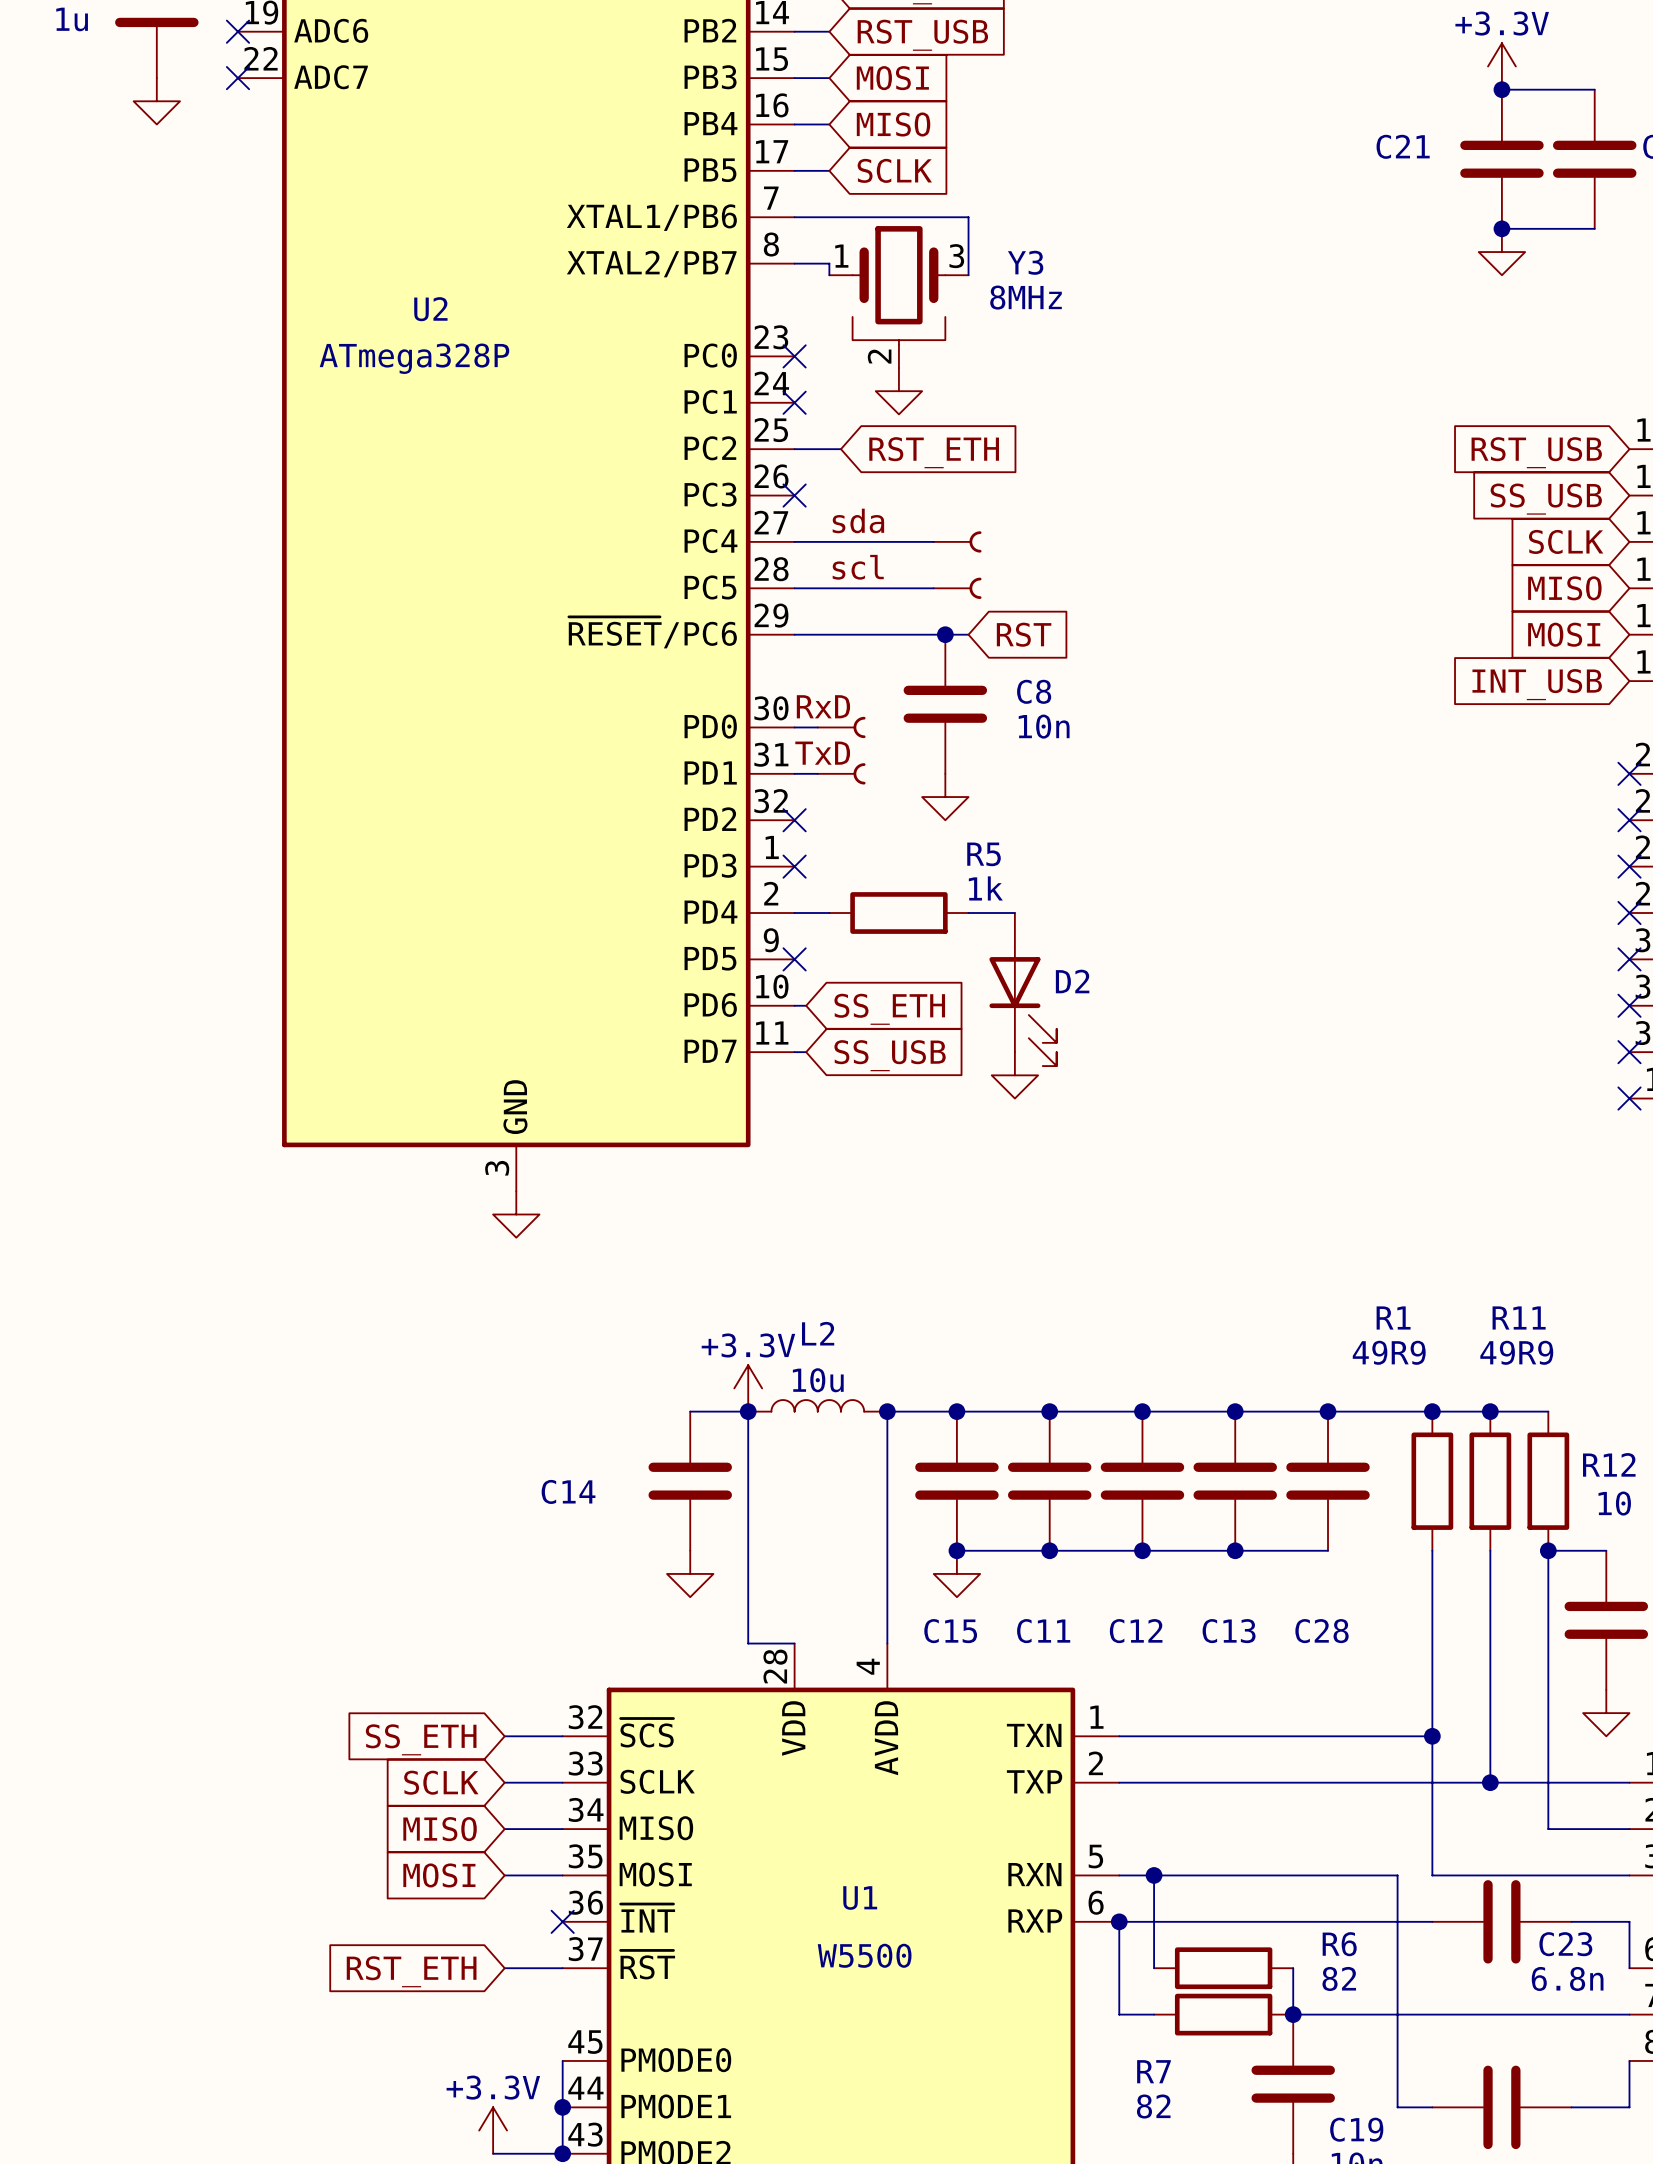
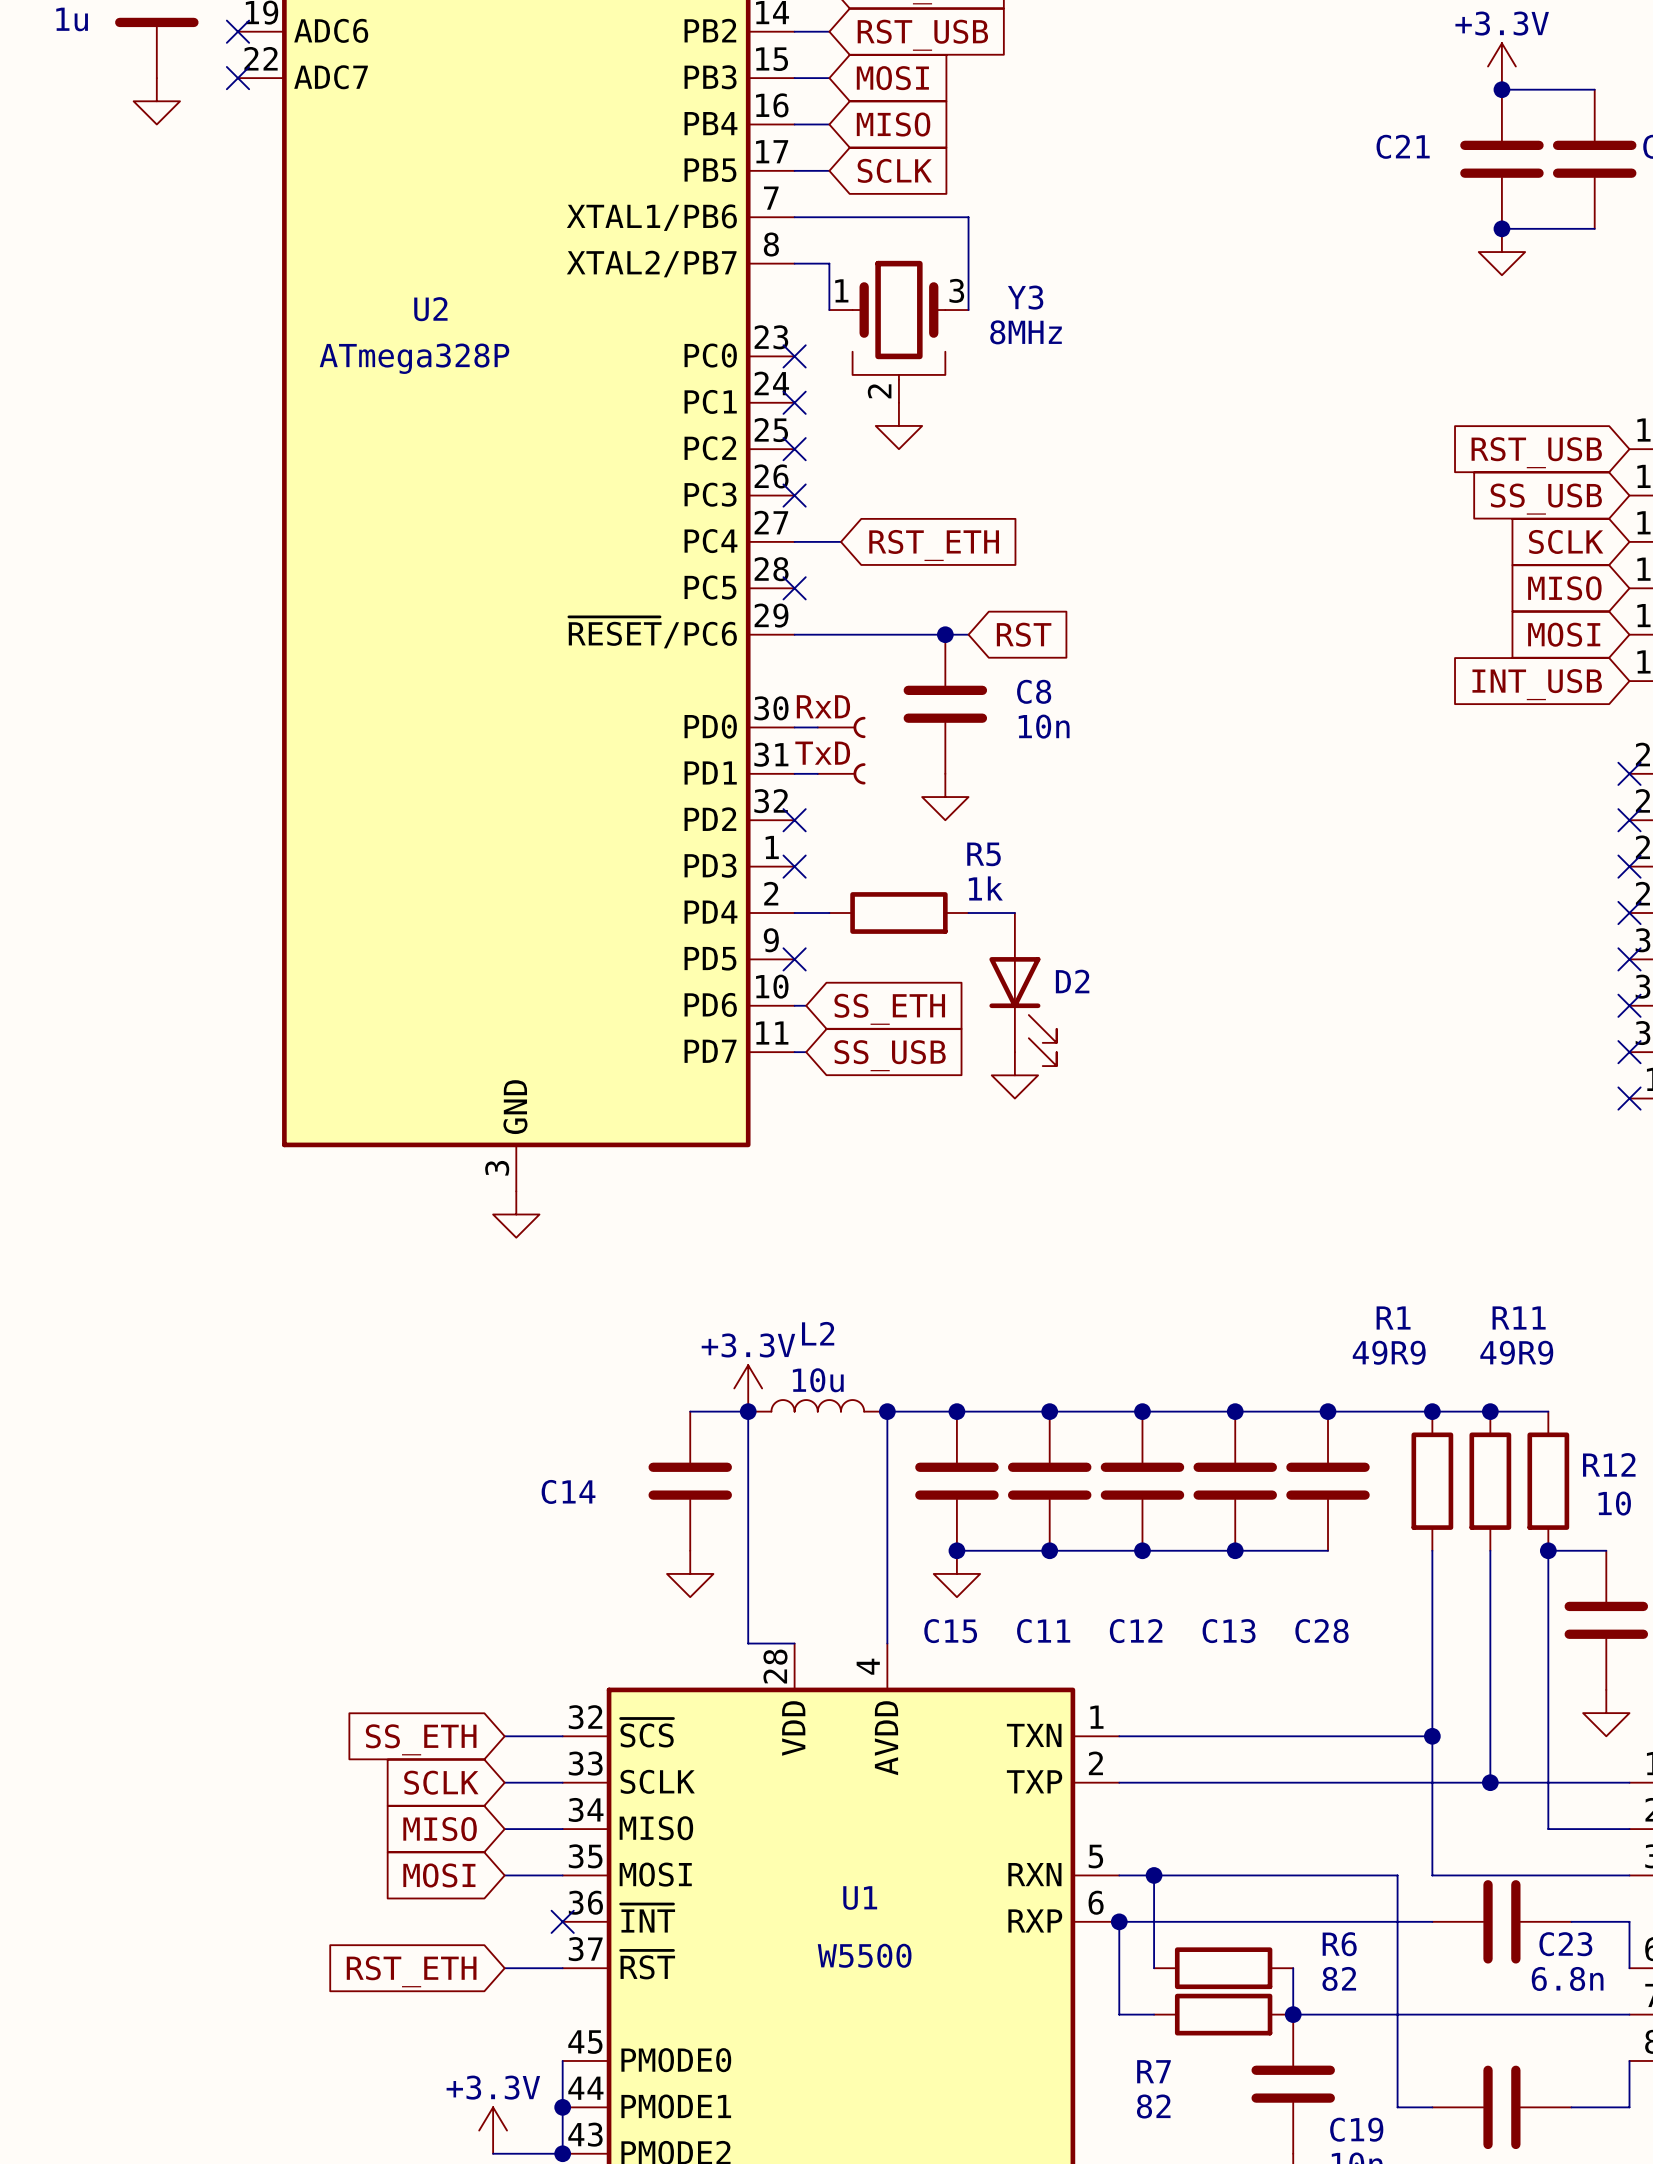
wire: none -> (829, 275) (829, 310)
wire: none -> (968, 275) (968, 310)
Y3 position: (898, 297) -> (898, 331)
power symbol position: (898, 391) -> (898, 425)
wire: (794, 449) (840, 449) -> none
no-connect mark: none -> (794, 449)
global label position: RST_ETH (934, 452) -> RST_ETH (934, 545)
label: sda (858, 520) -> none
wire: (840, 541) (933, 541) -> none
part: (957, 541) -> none
label: scl (858, 567) -> none
wire: (794, 588) (933, 588) -> none
no-connect mark: none -> (794, 588)
part: (957, 588) -> none

